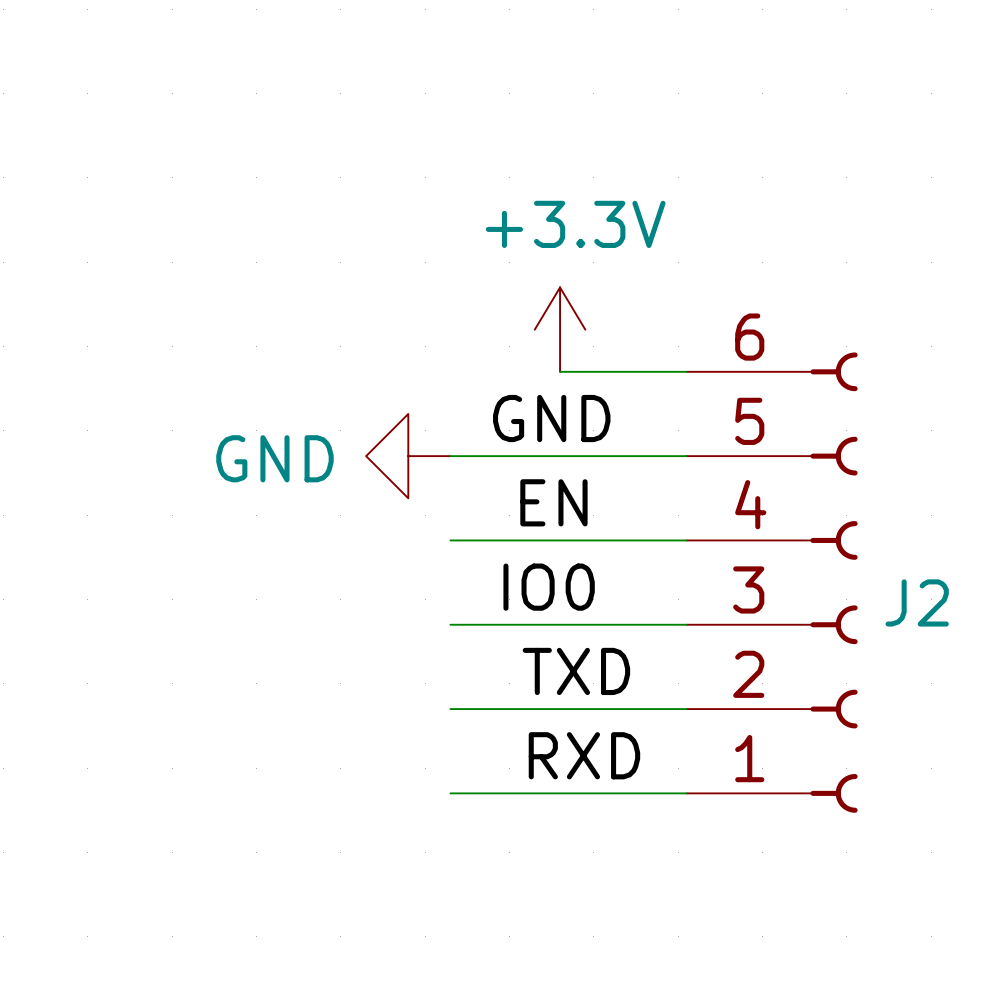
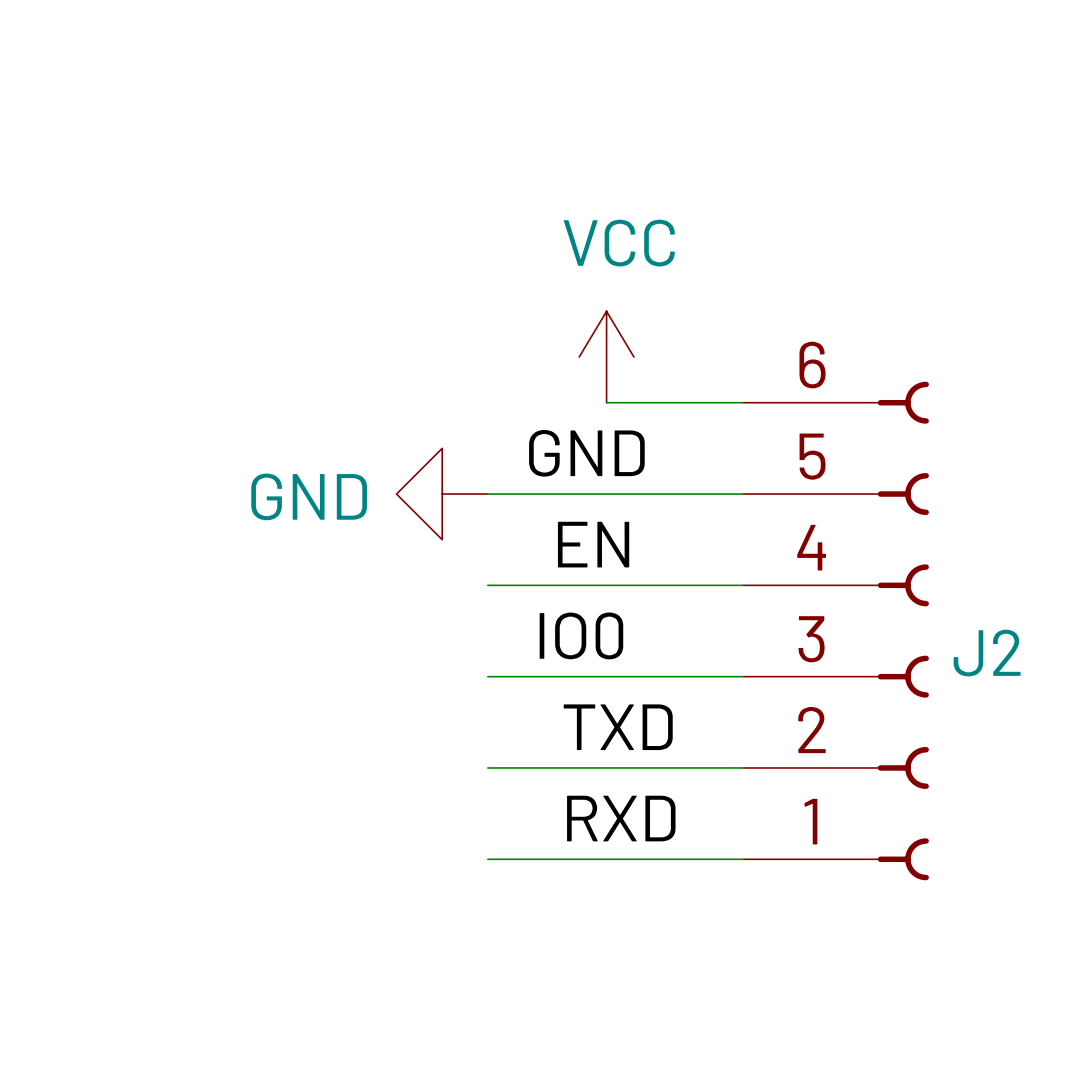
power symbol: +3.3V (560, 329) -> VCC (606, 357)

